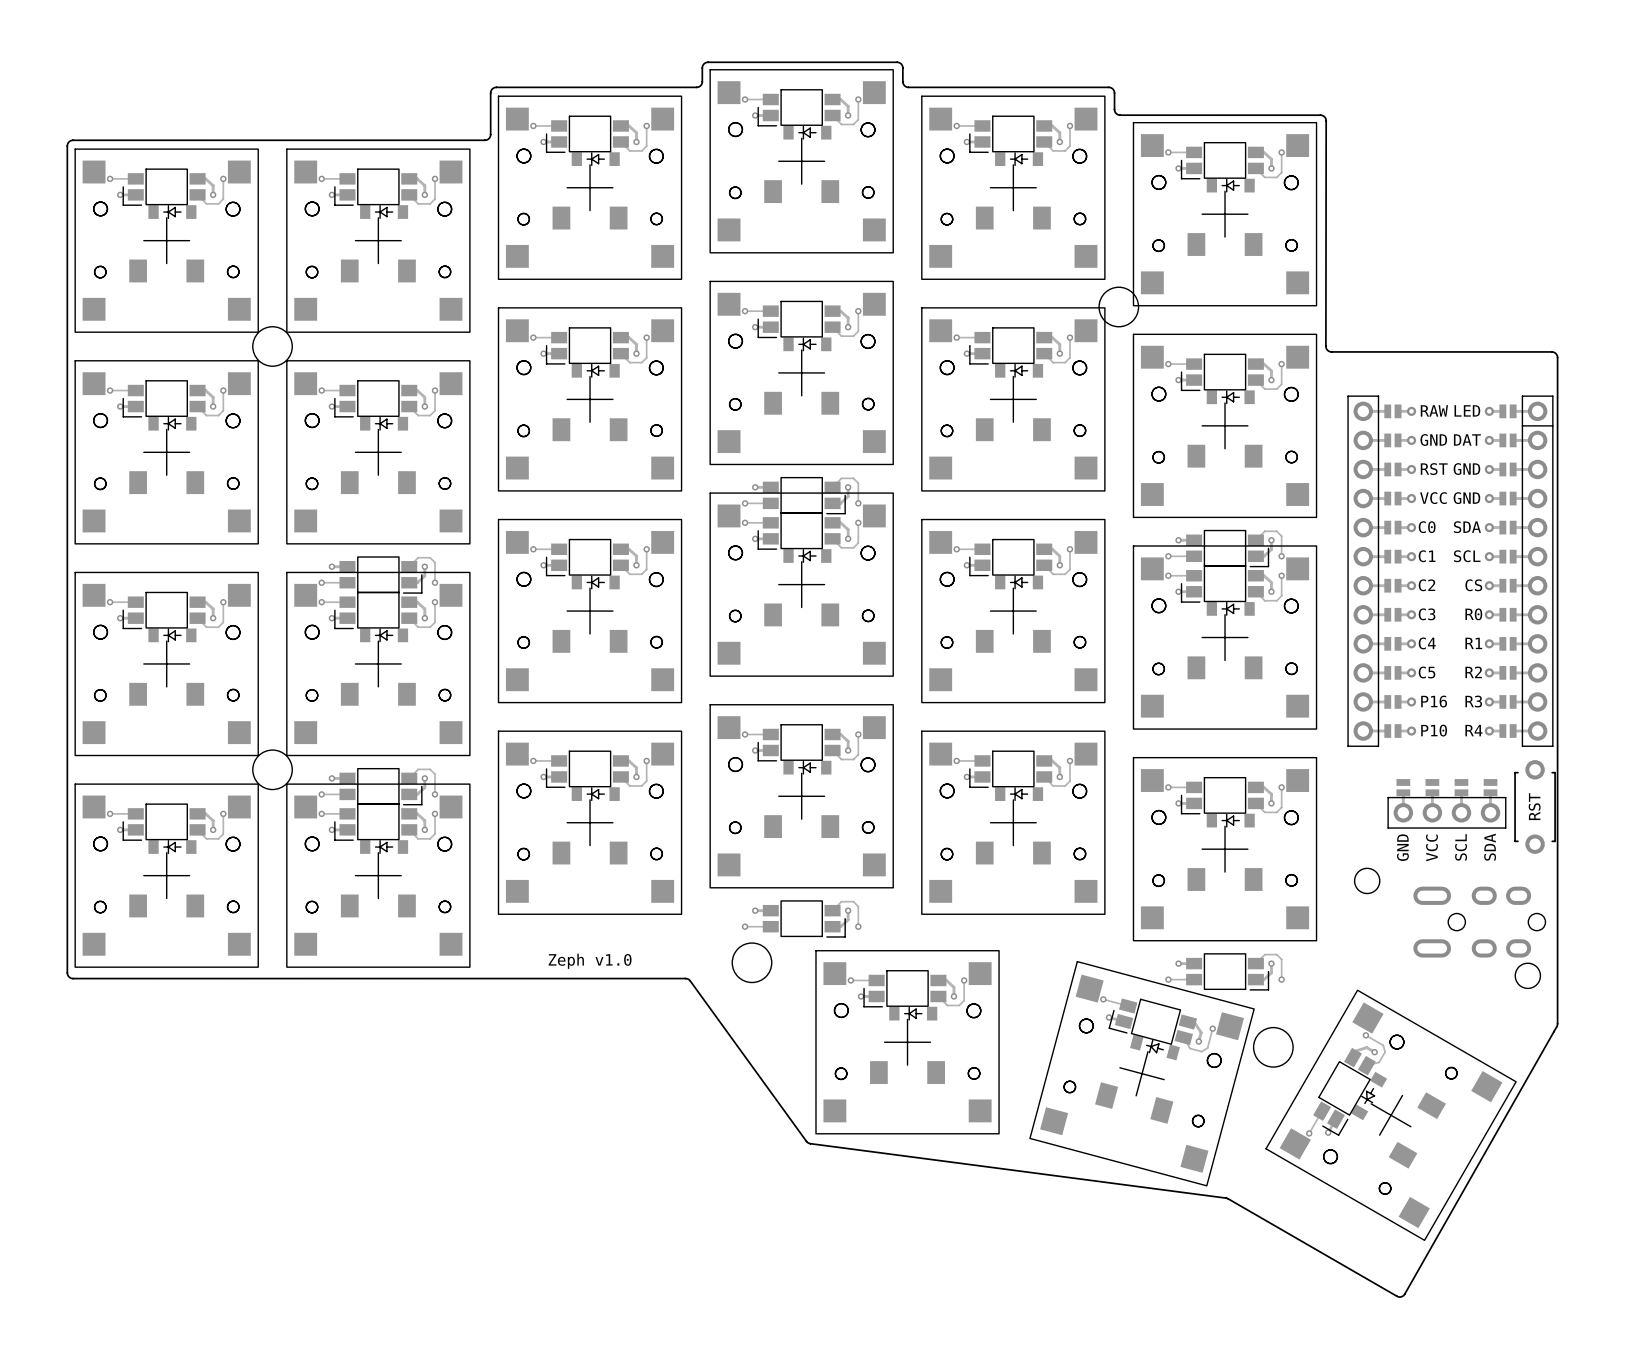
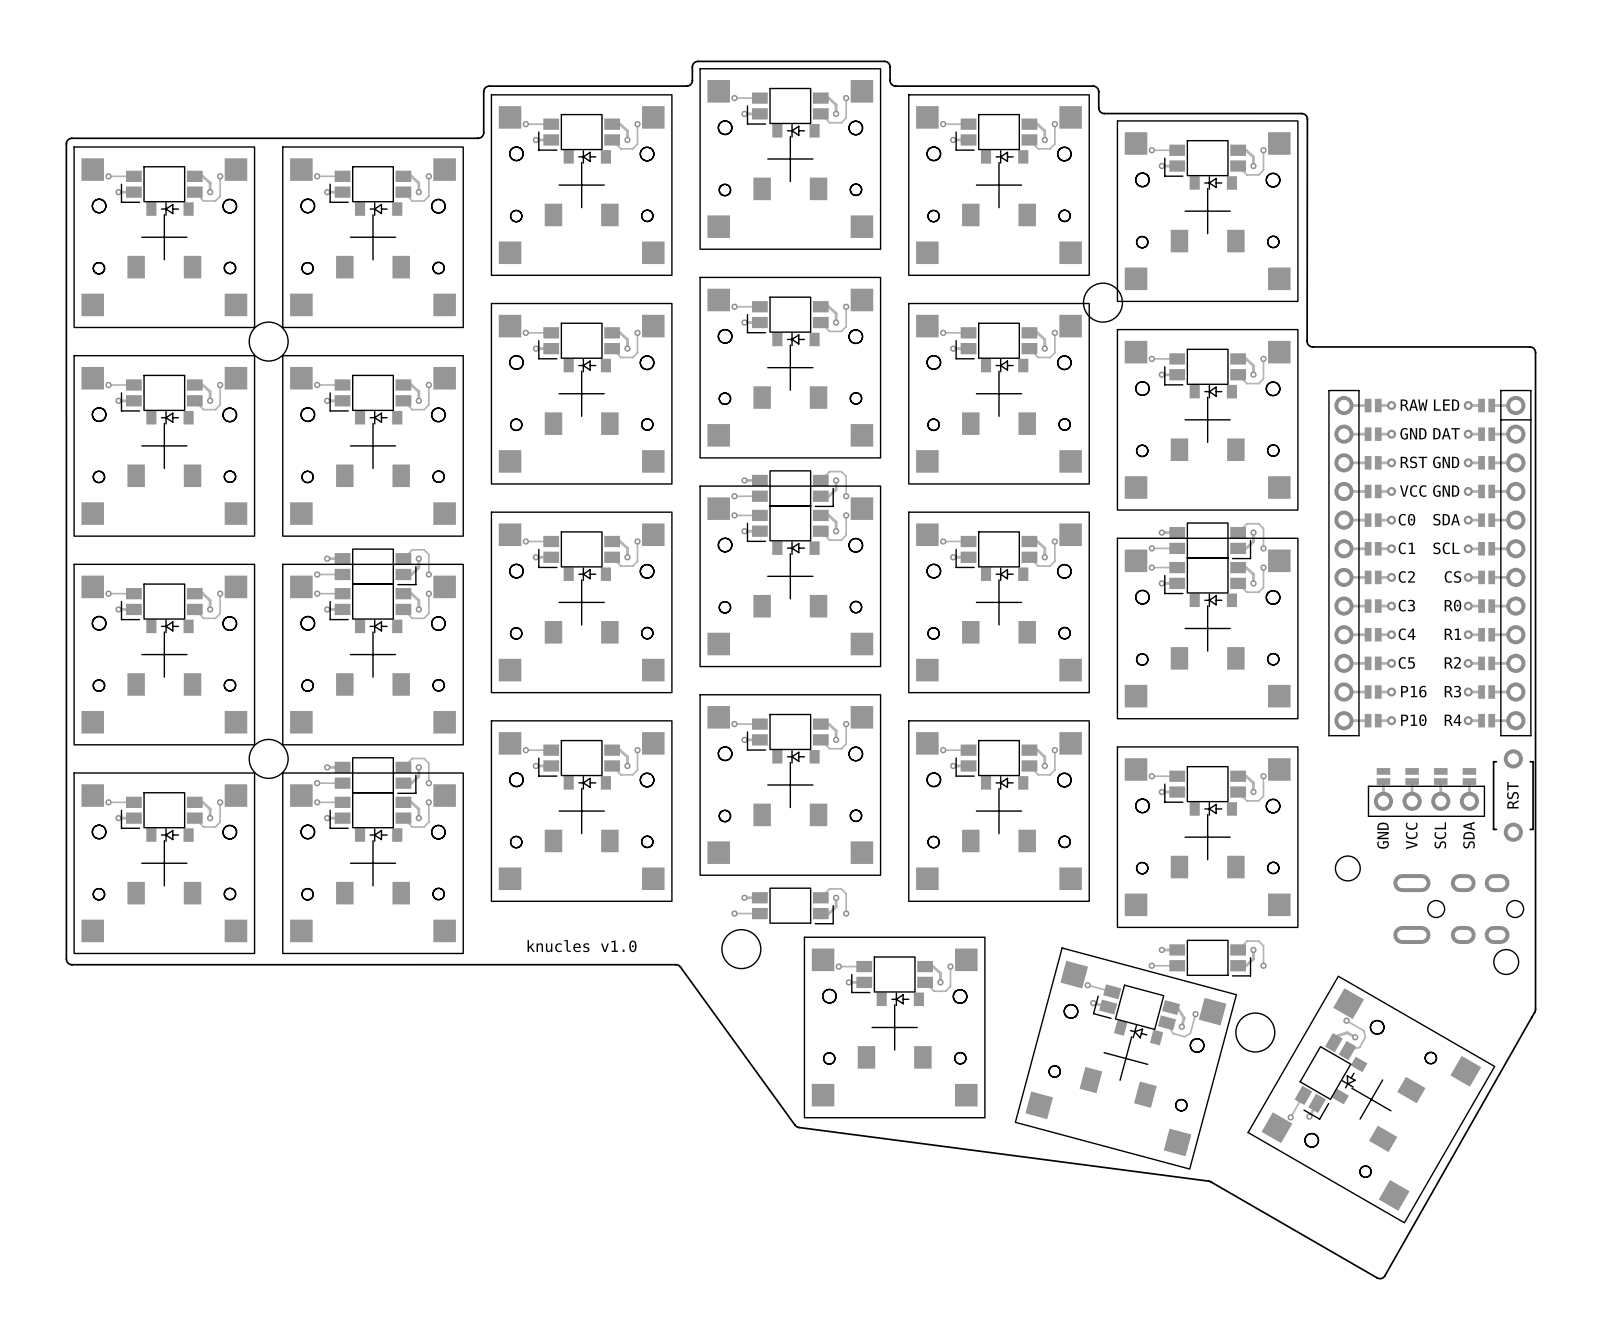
text: Zeph v1.0 (590, 961) -> knucles v1.0 (582, 946)

